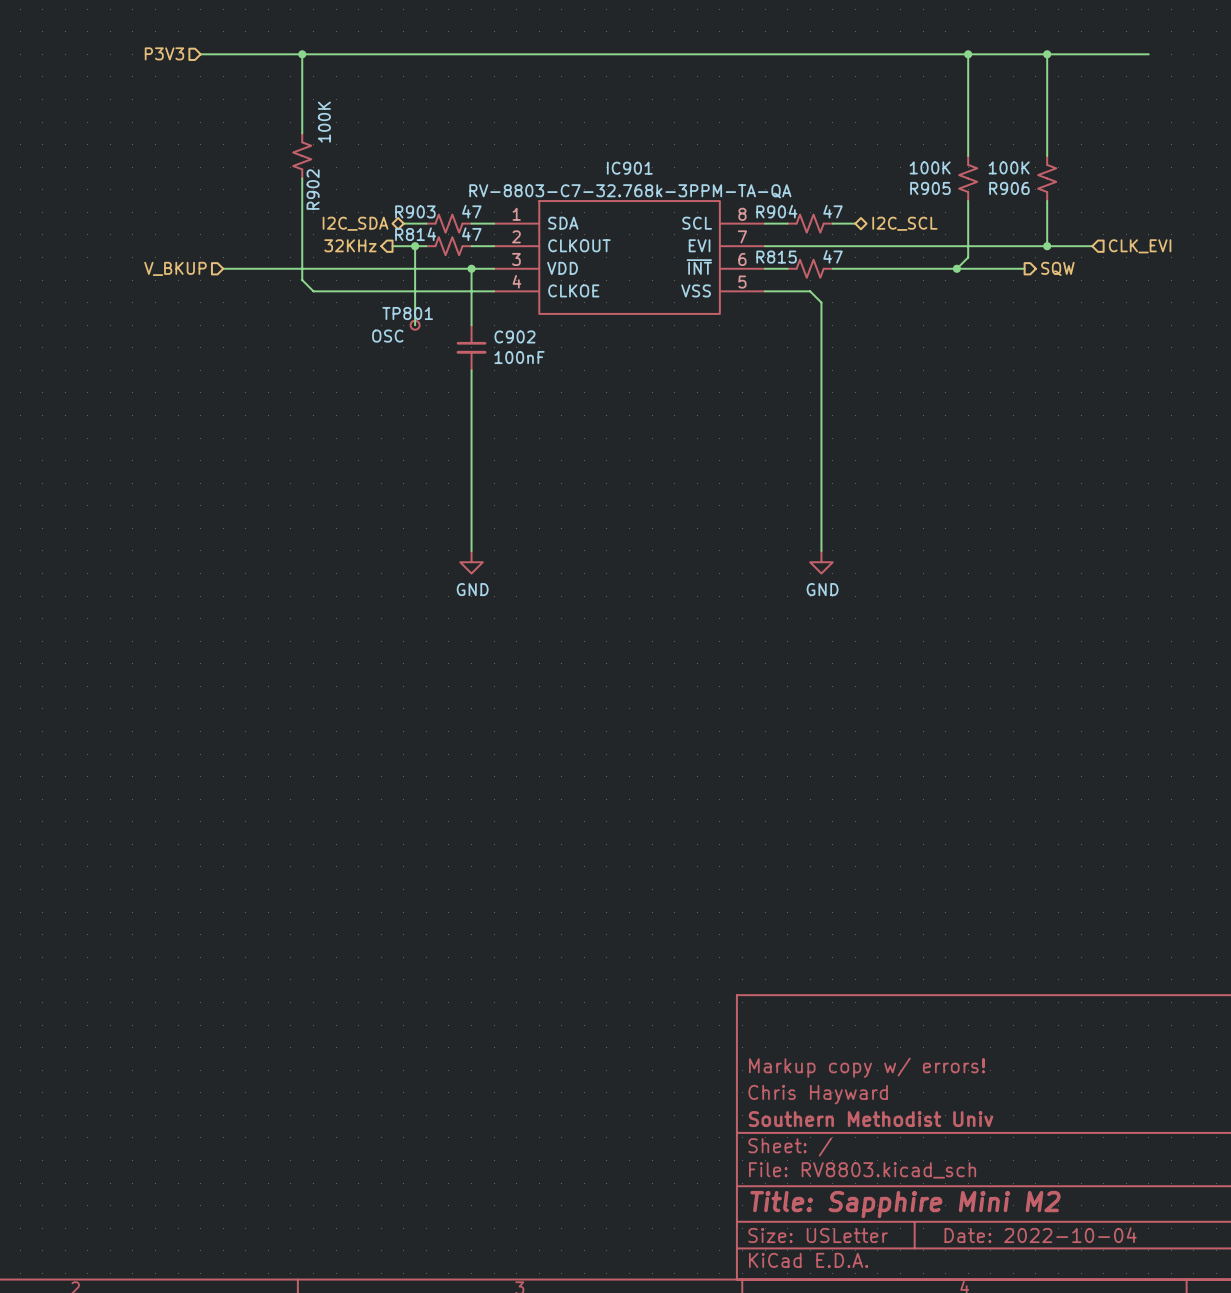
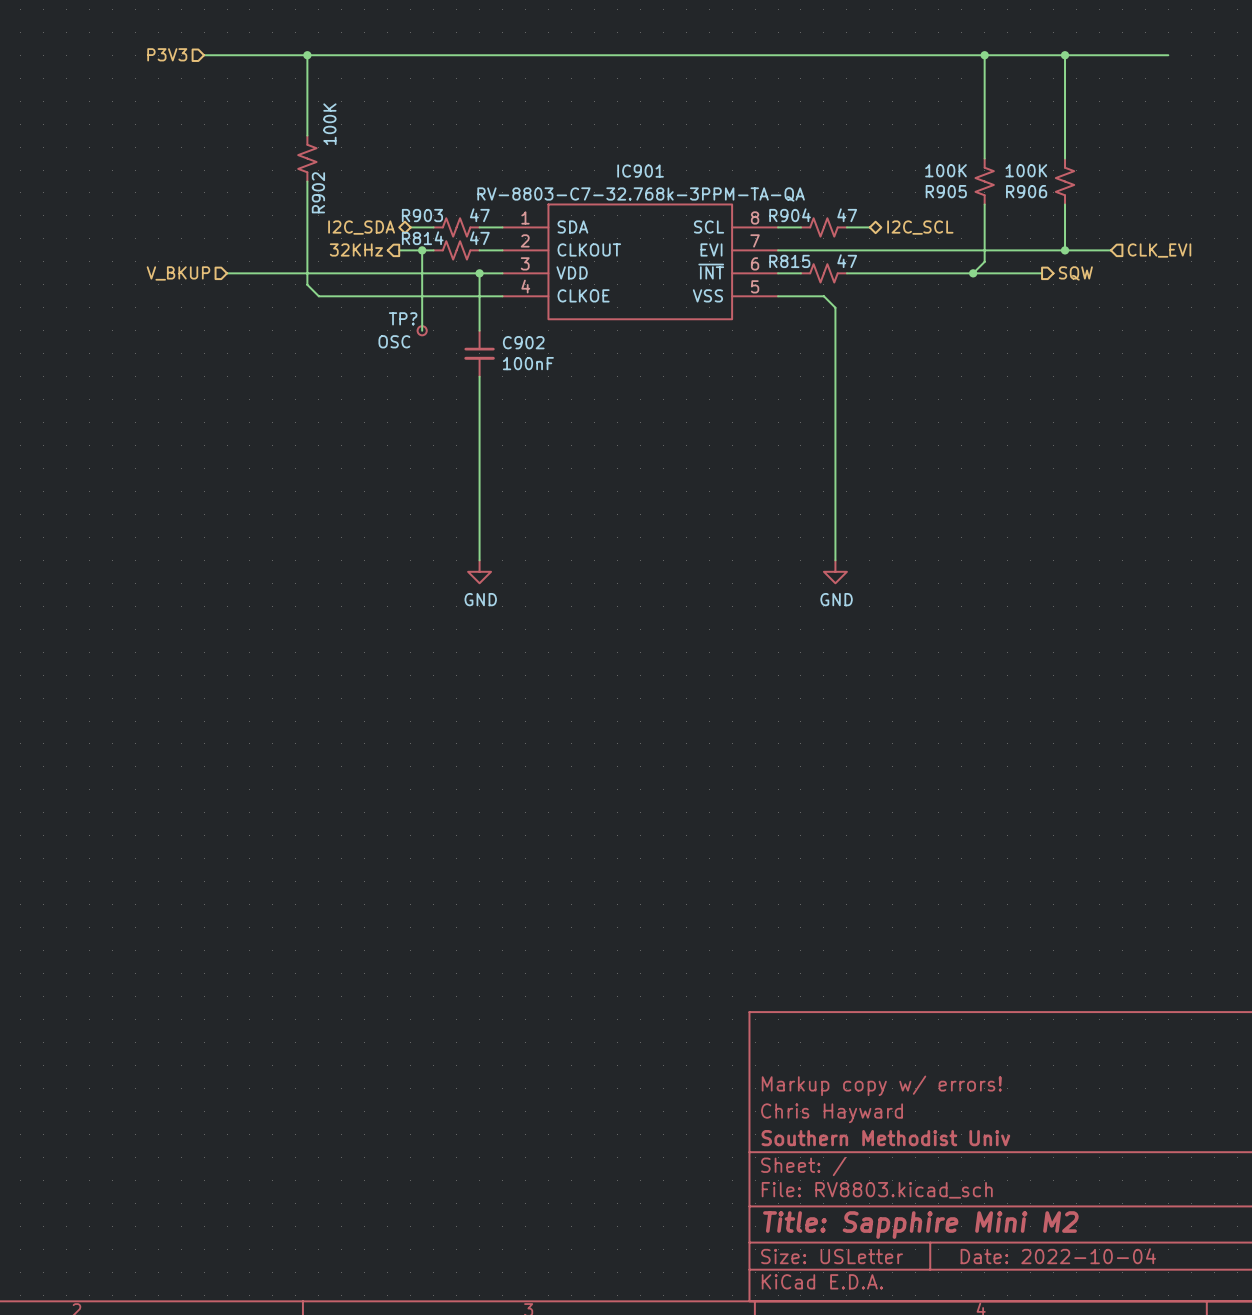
TP801 name: TP801 (407, 313) -> TP? (403, 318)

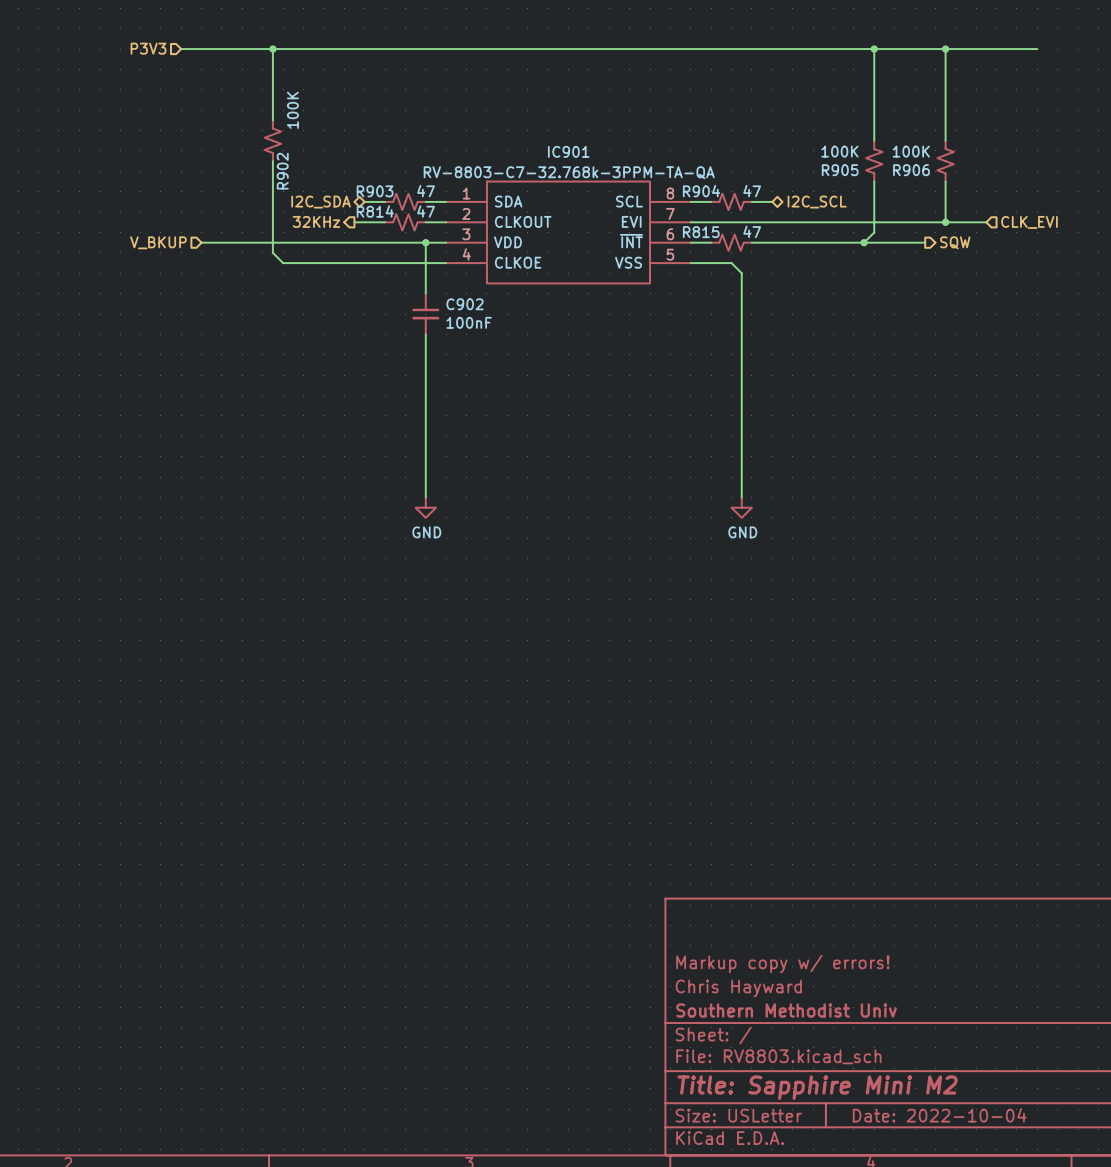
wire: (422, 250) (422, 330) -> none
junction: (422, 250) -> none
TP?: OSC (422, 330) -> none

